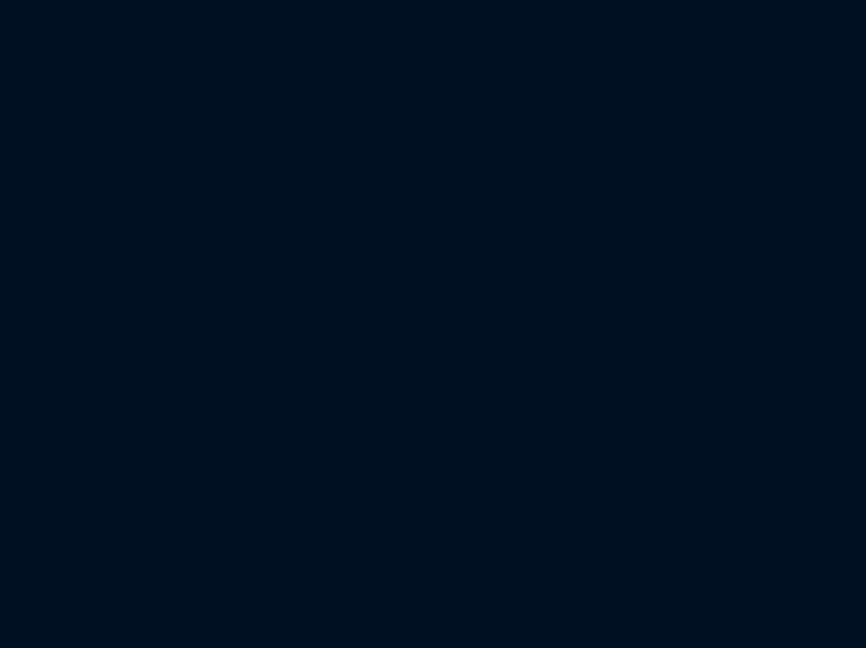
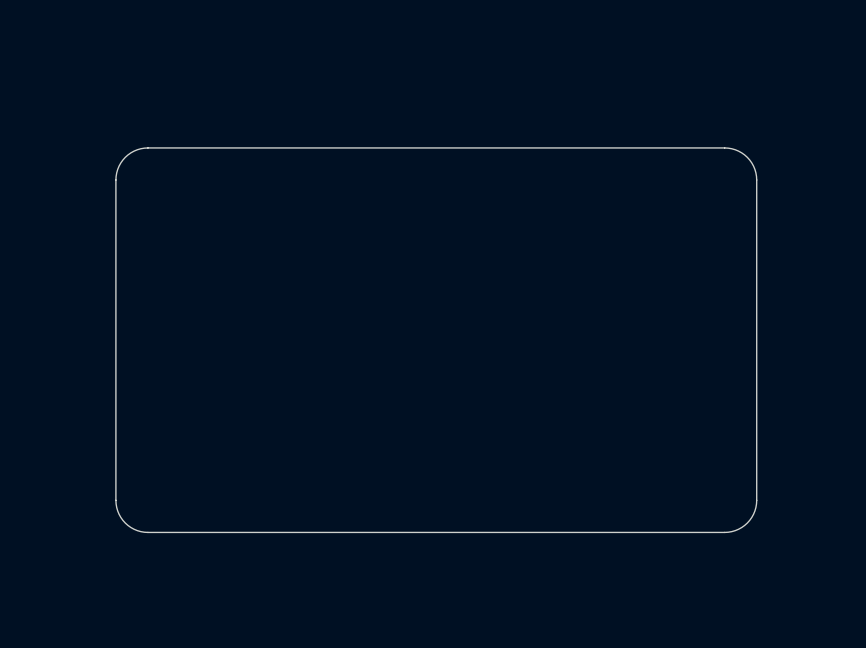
board edge: none -> (724, 147) (147, 147) (130, 152) (119, 166) (115, 179) (115, 500) (120, 517) (130, 527) (147, 532) (724, 532) (741, 527) (751, 517) (756, 500) (756, 179) (753, 166) (747, 157) (738, 151) (724, 147)

